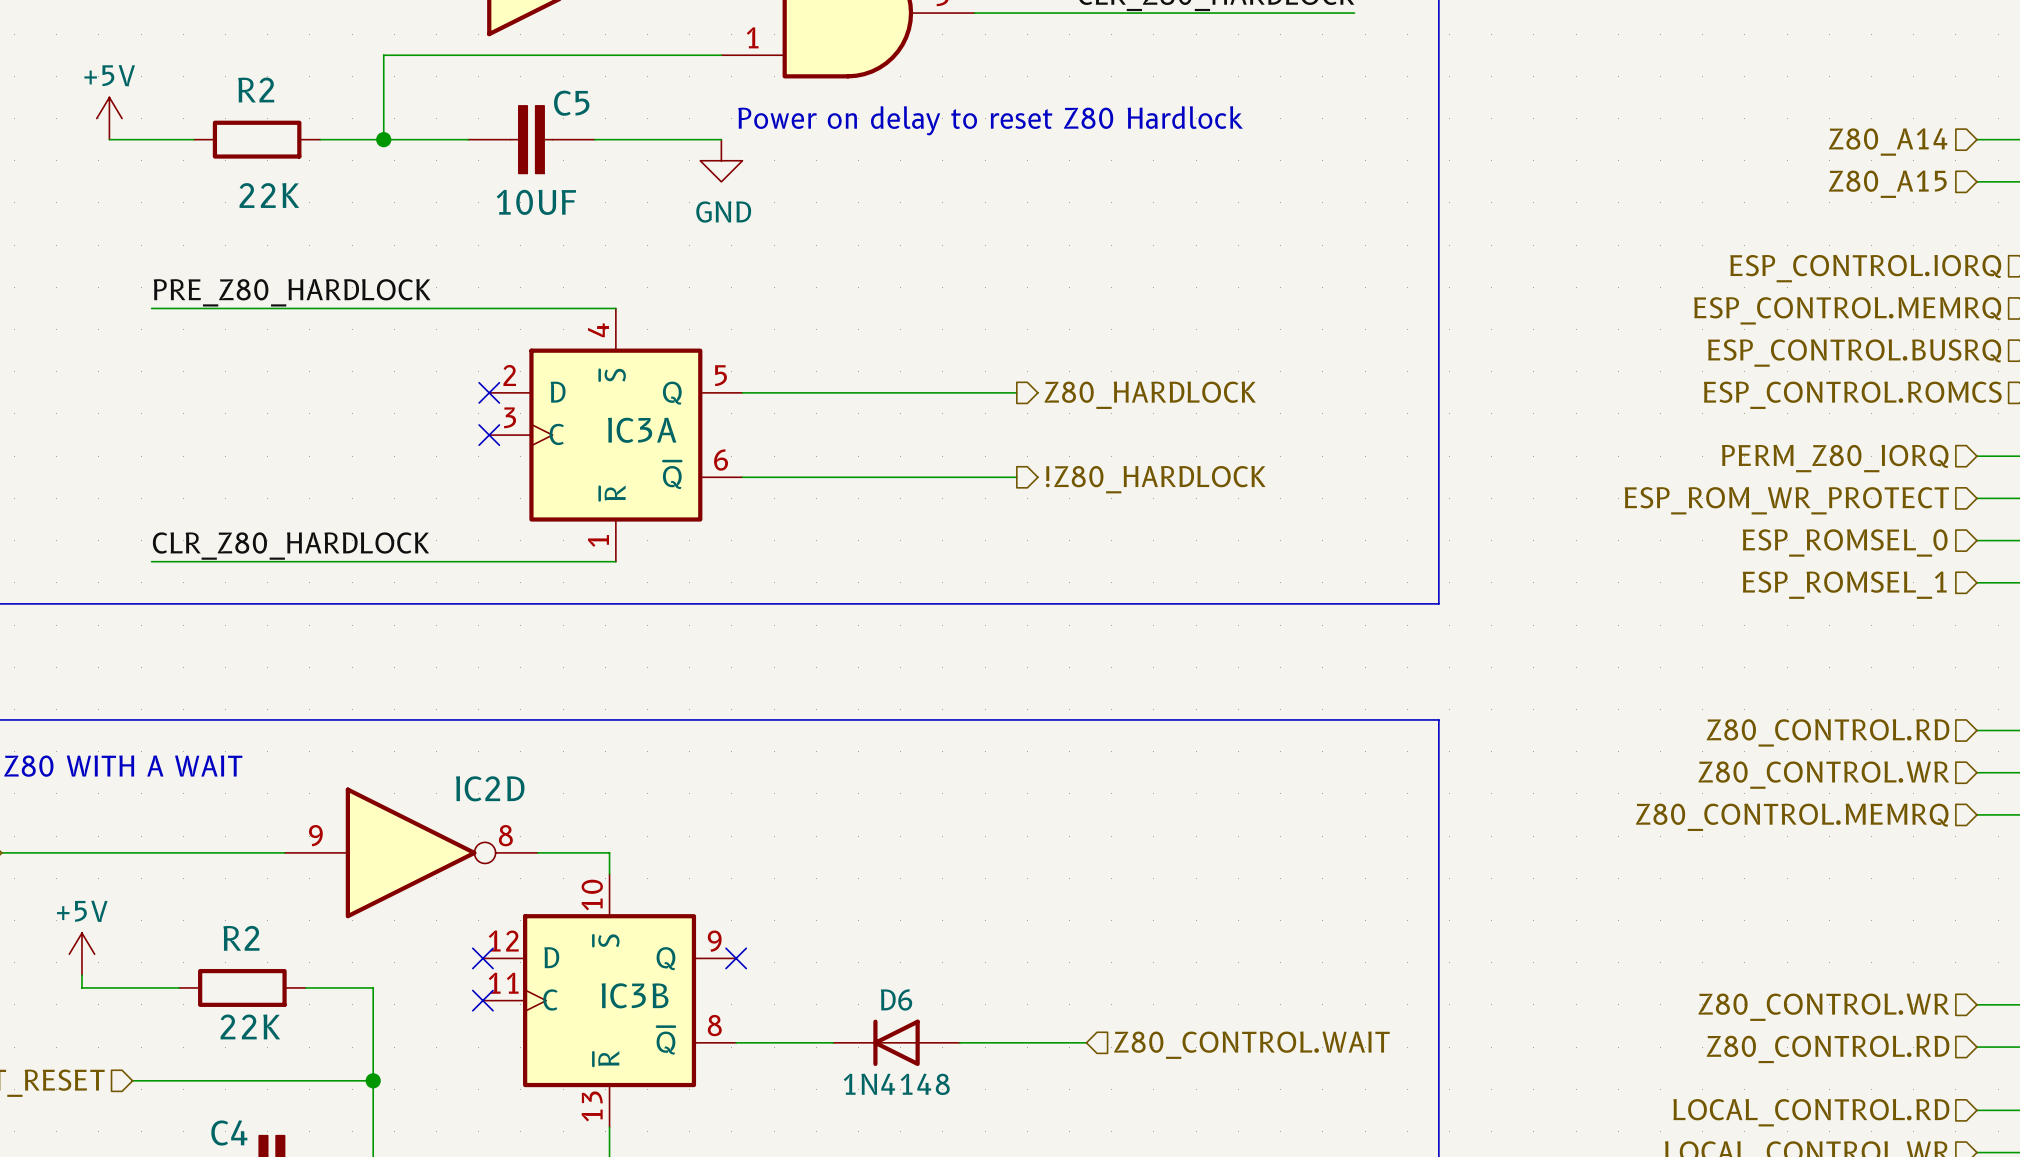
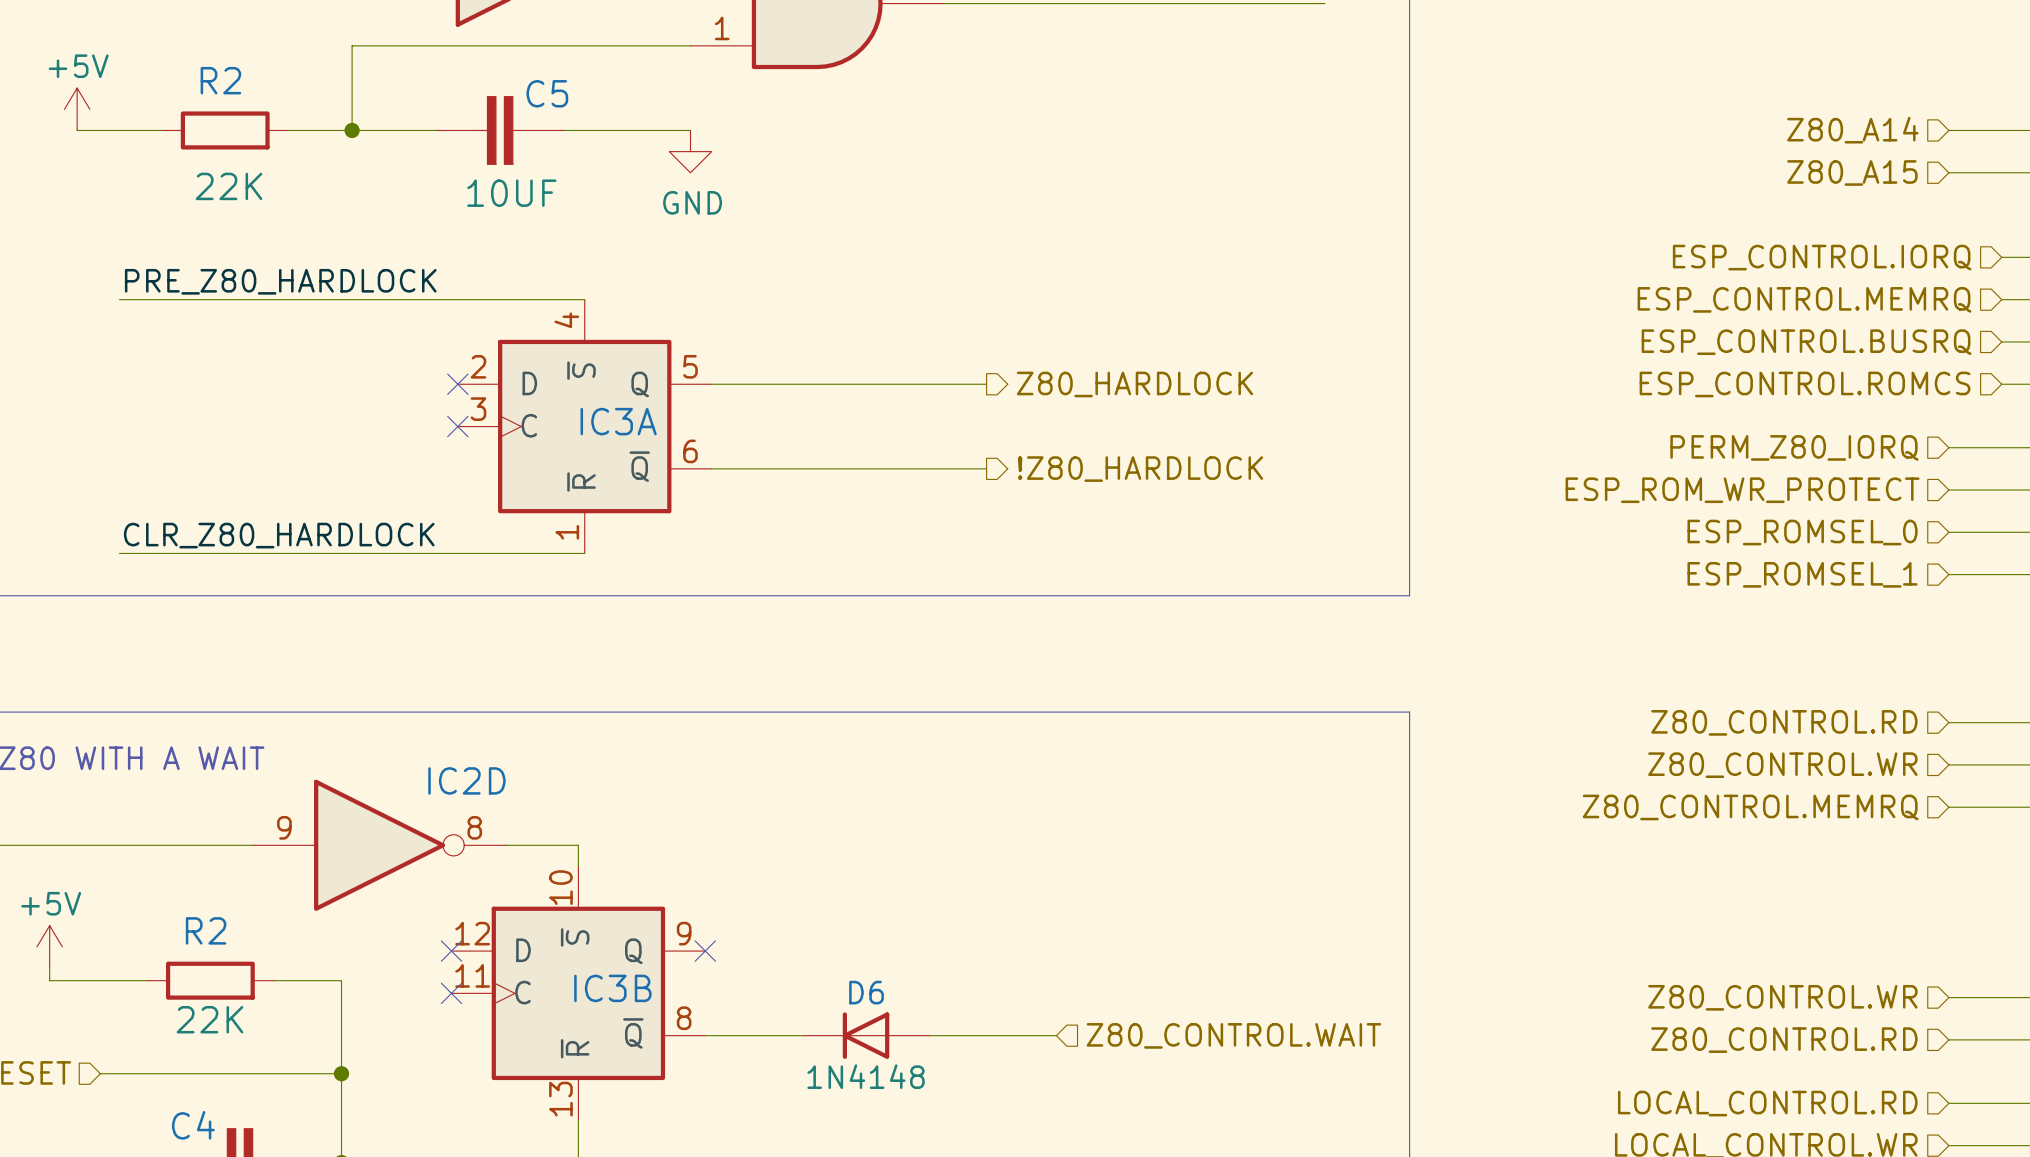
text: Power on delay to reset Z80 Hardlock (990, 120) -> none

